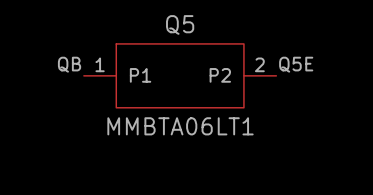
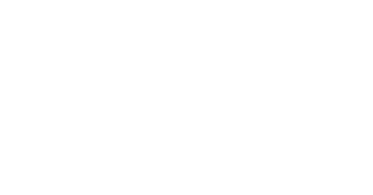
label: QB (69, 64) -> none
label: Q5E (296, 64) -> none
Q5: MMBTA06LT1 (180, 75) -> none

